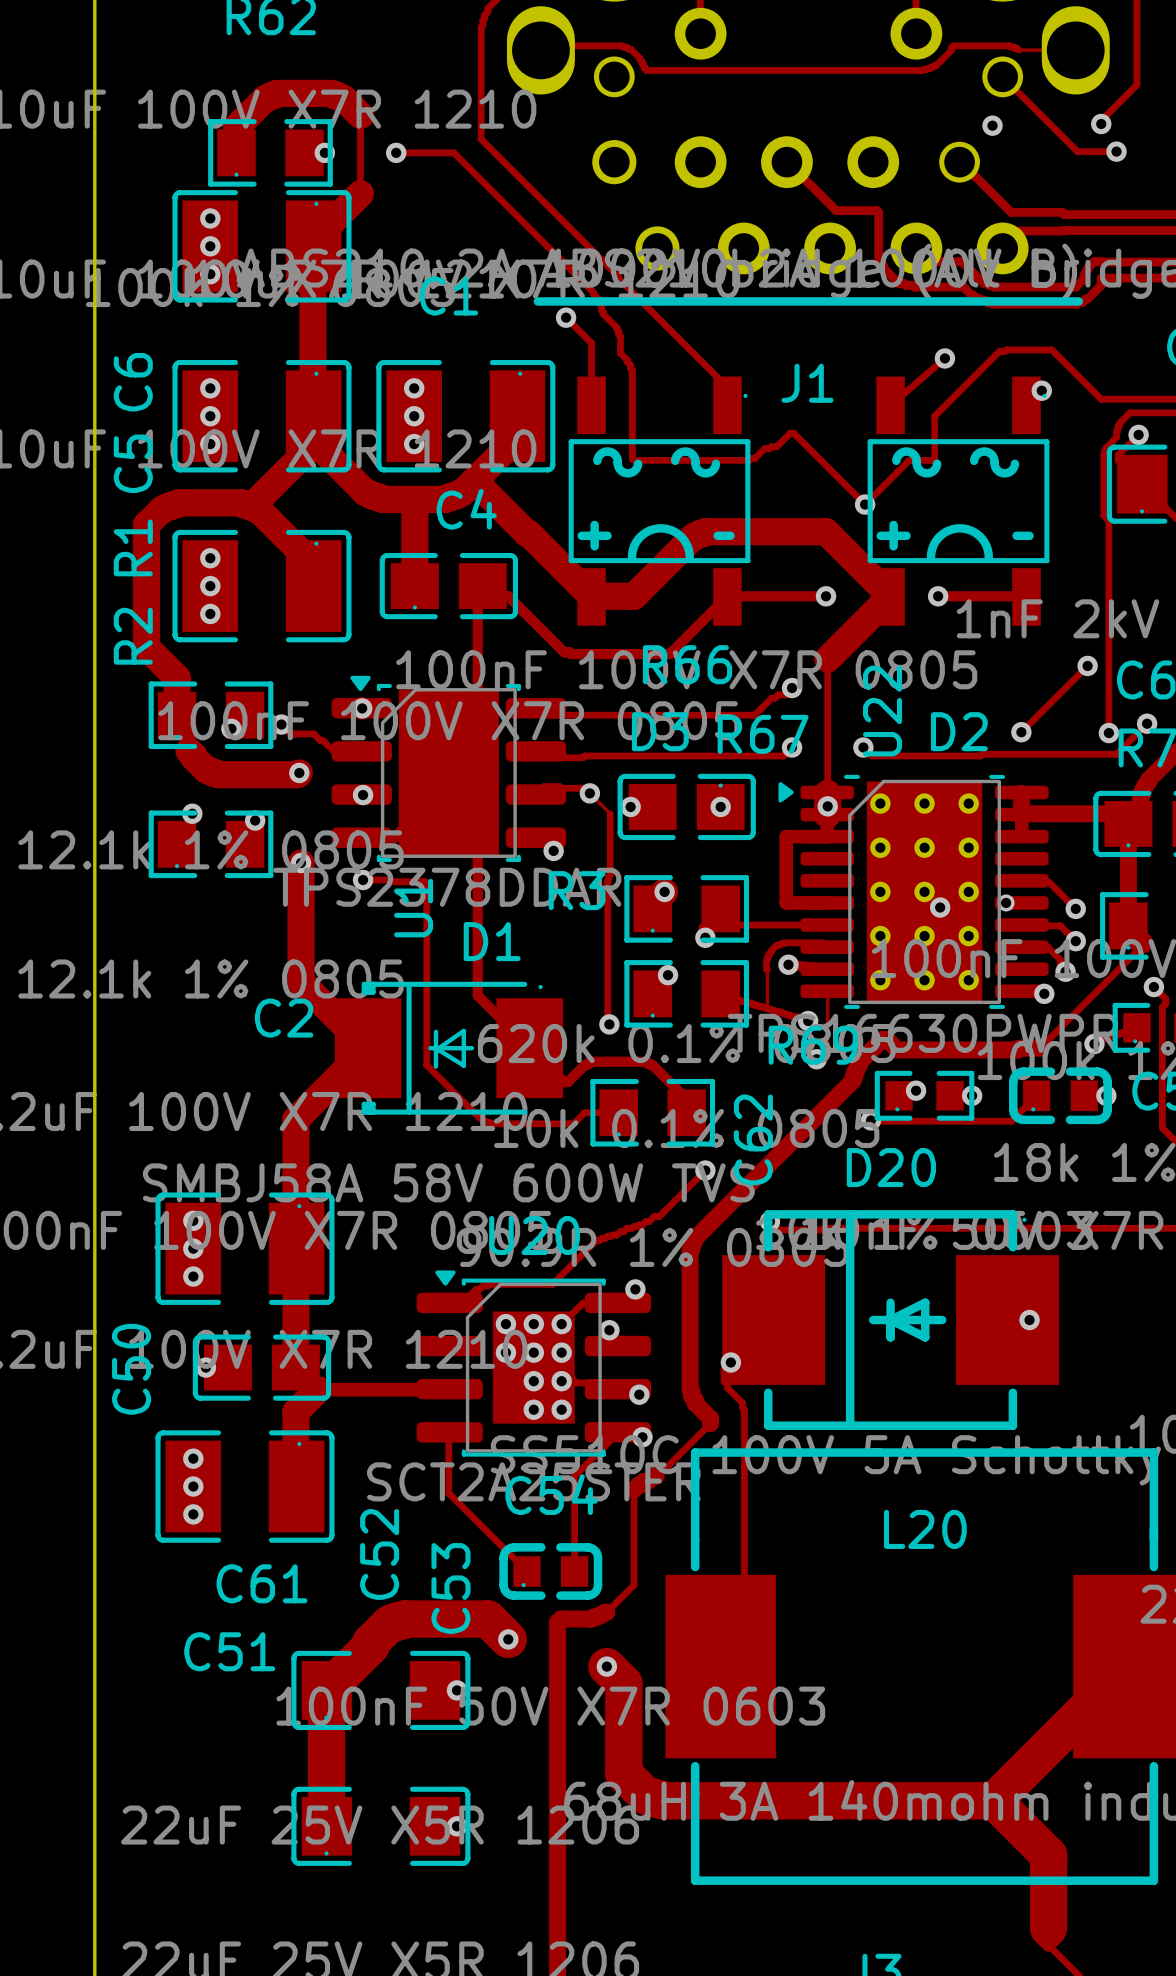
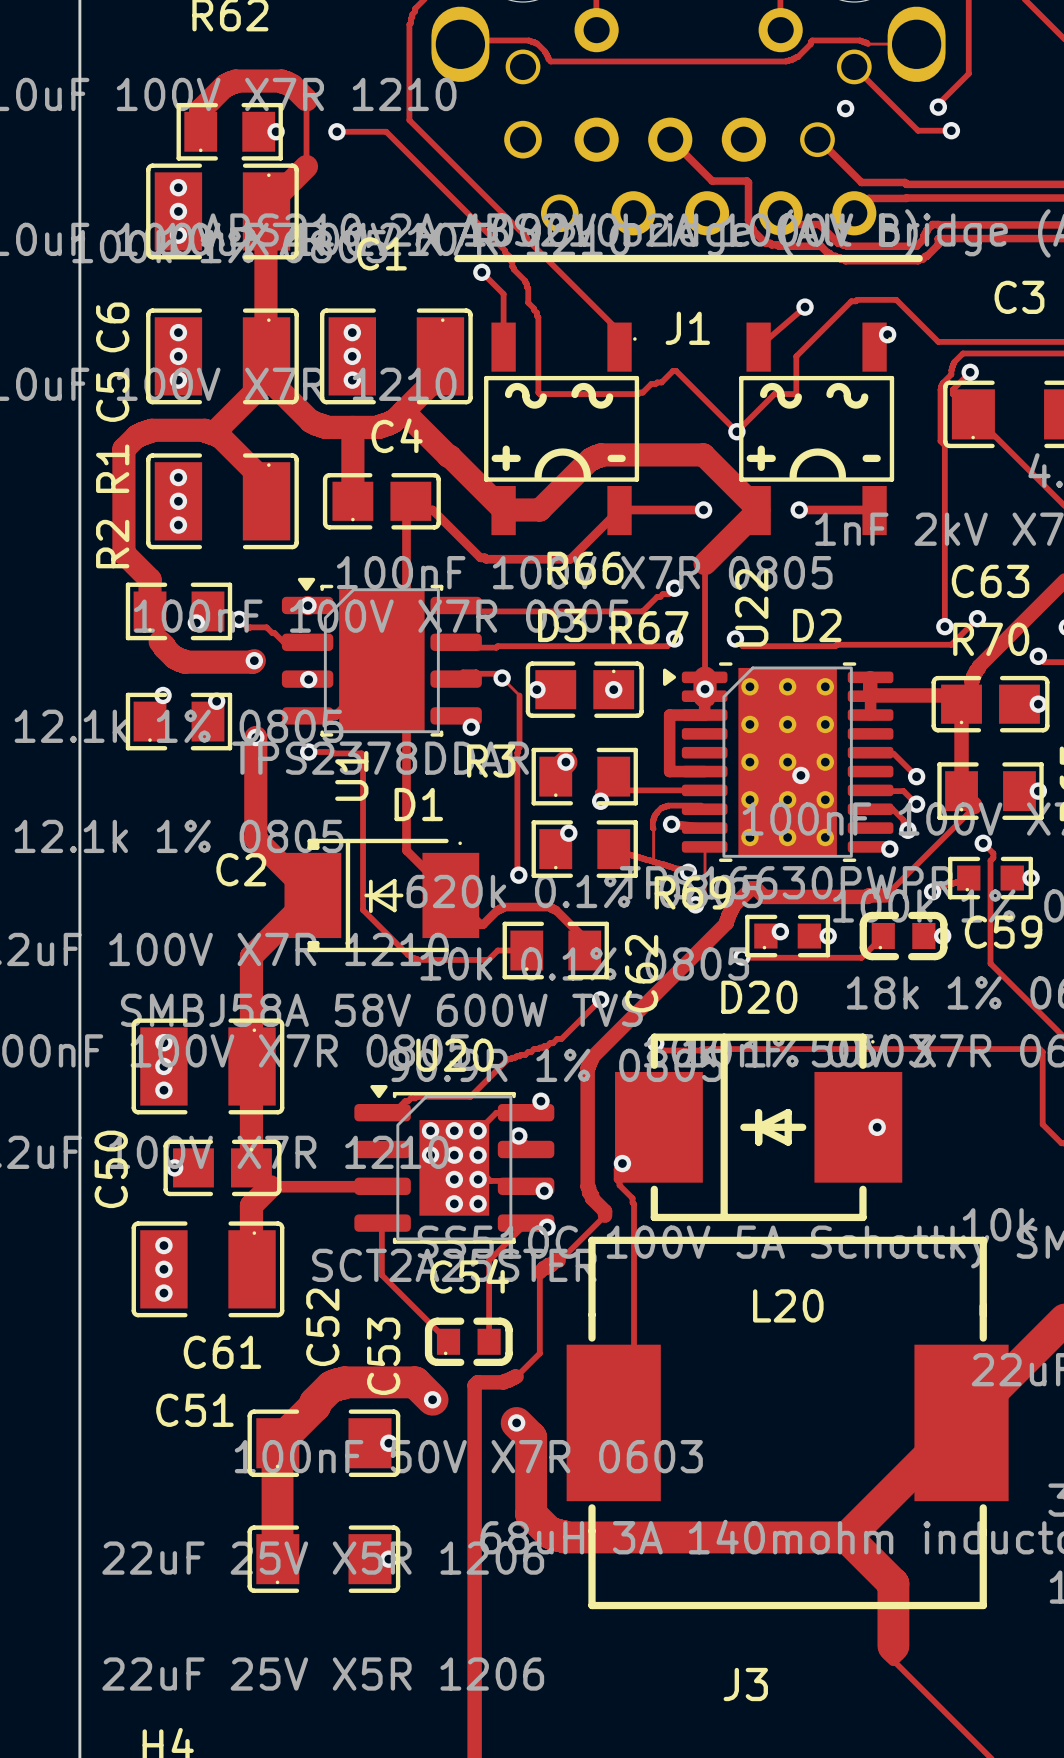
track: (1087, 665) (1021, 732) -> none
via: (1087, 665) -> none
via: (1021, 732) -> none
via: (1006, 902) -> none

